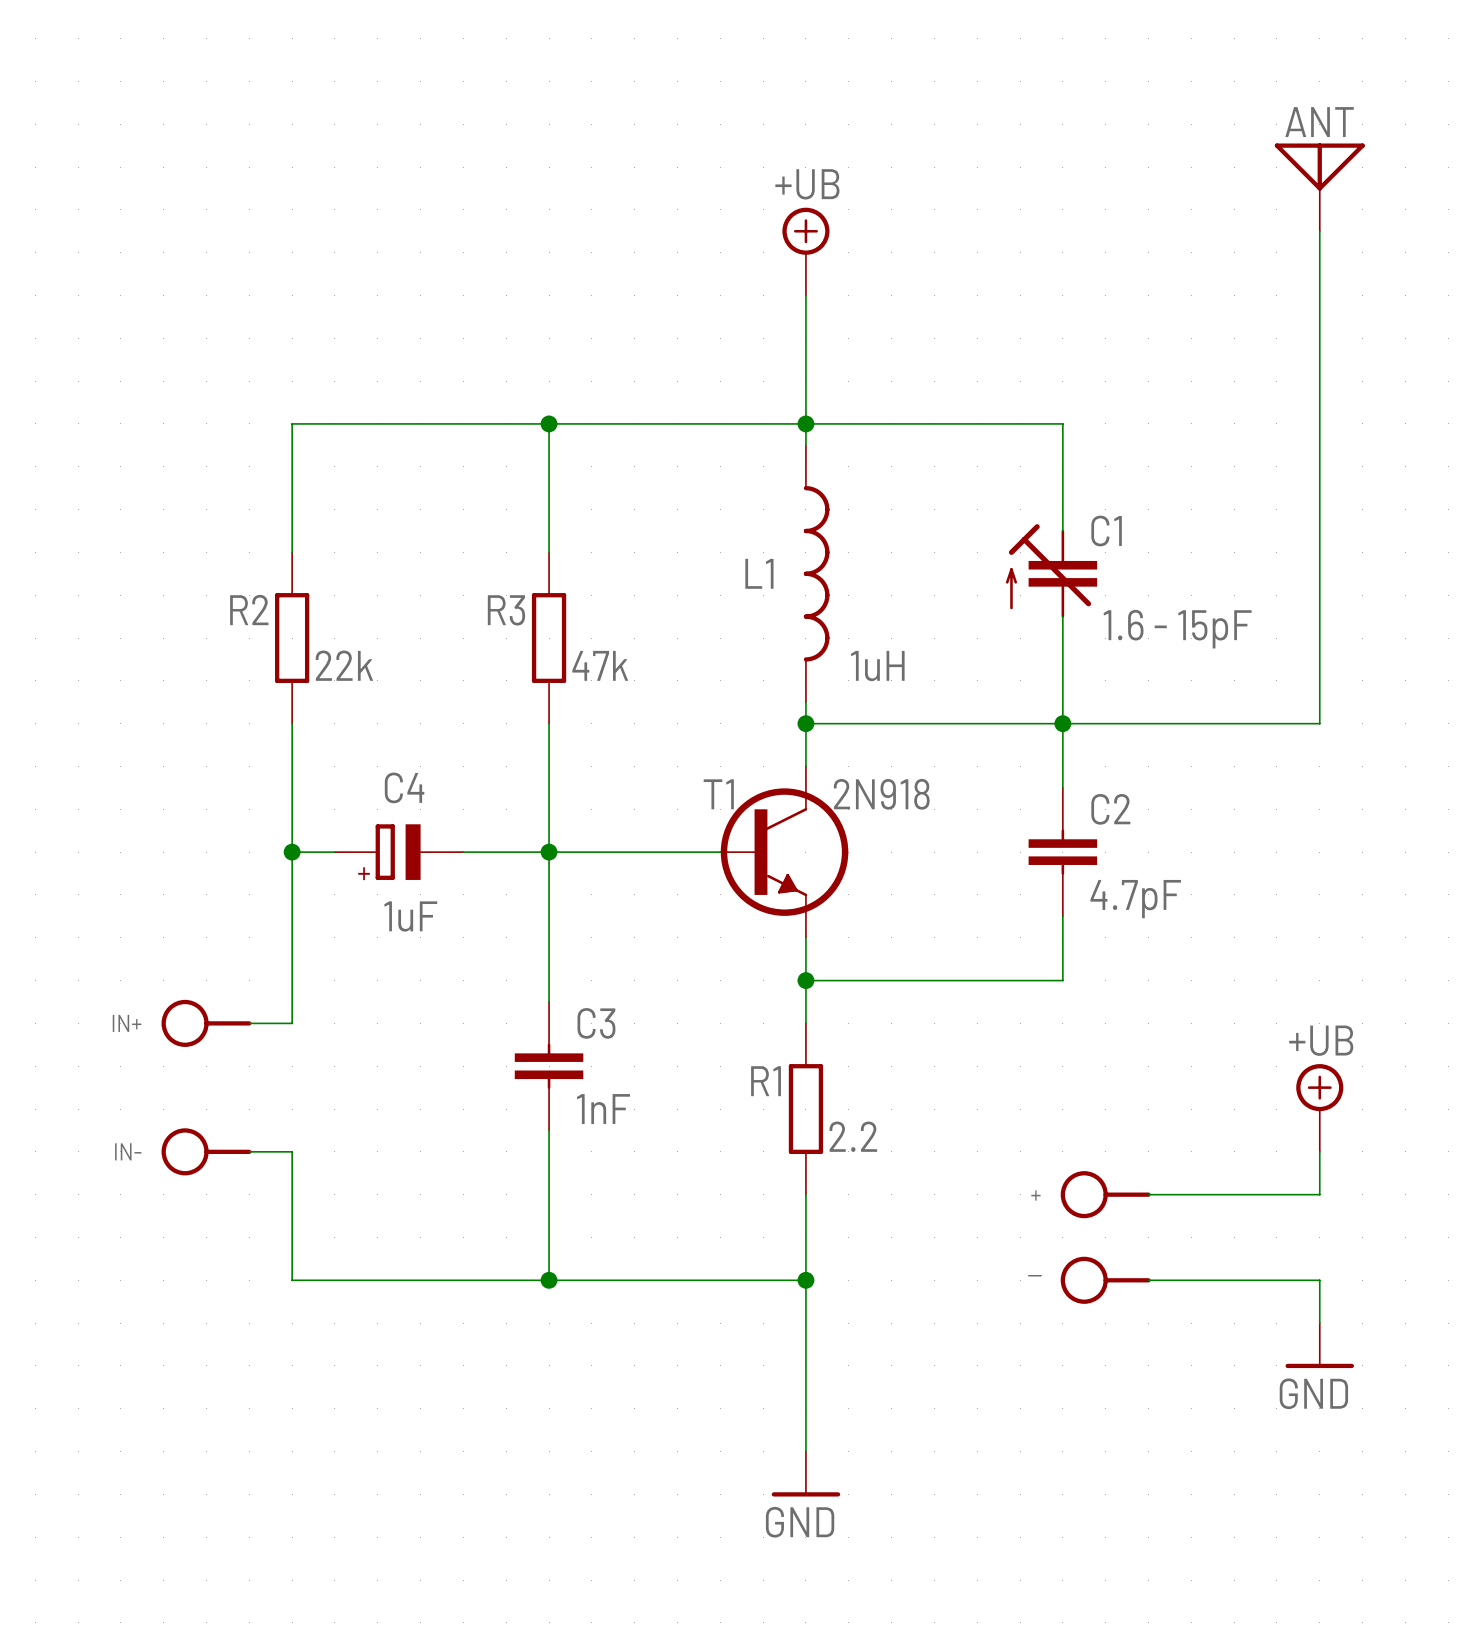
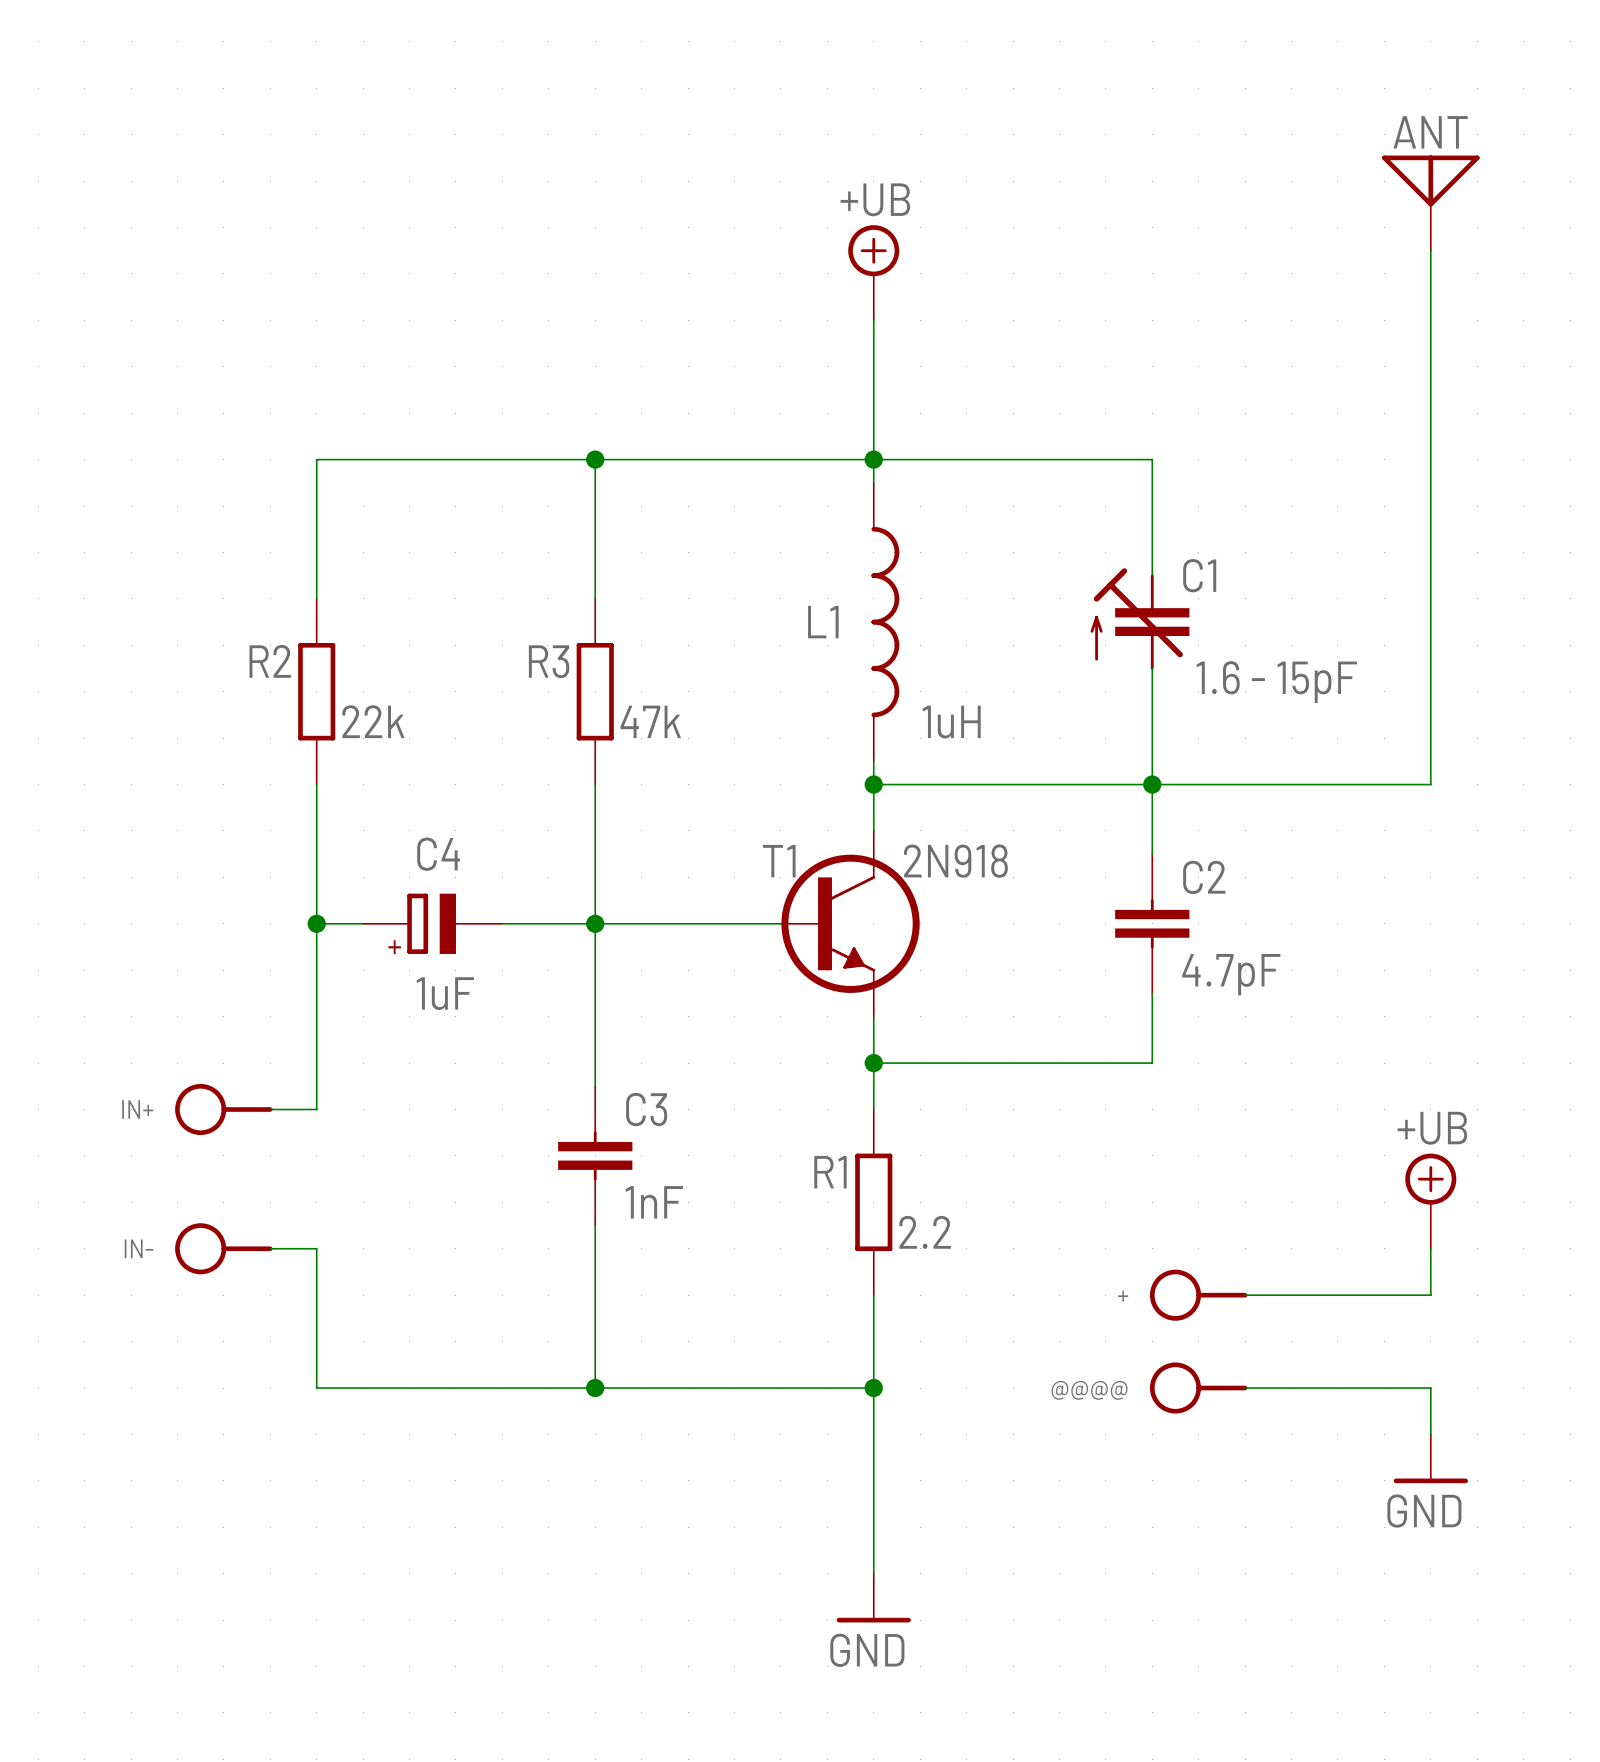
part name: ̶̶ (1034, 1275) -> @@@@ (1089, 1390)

